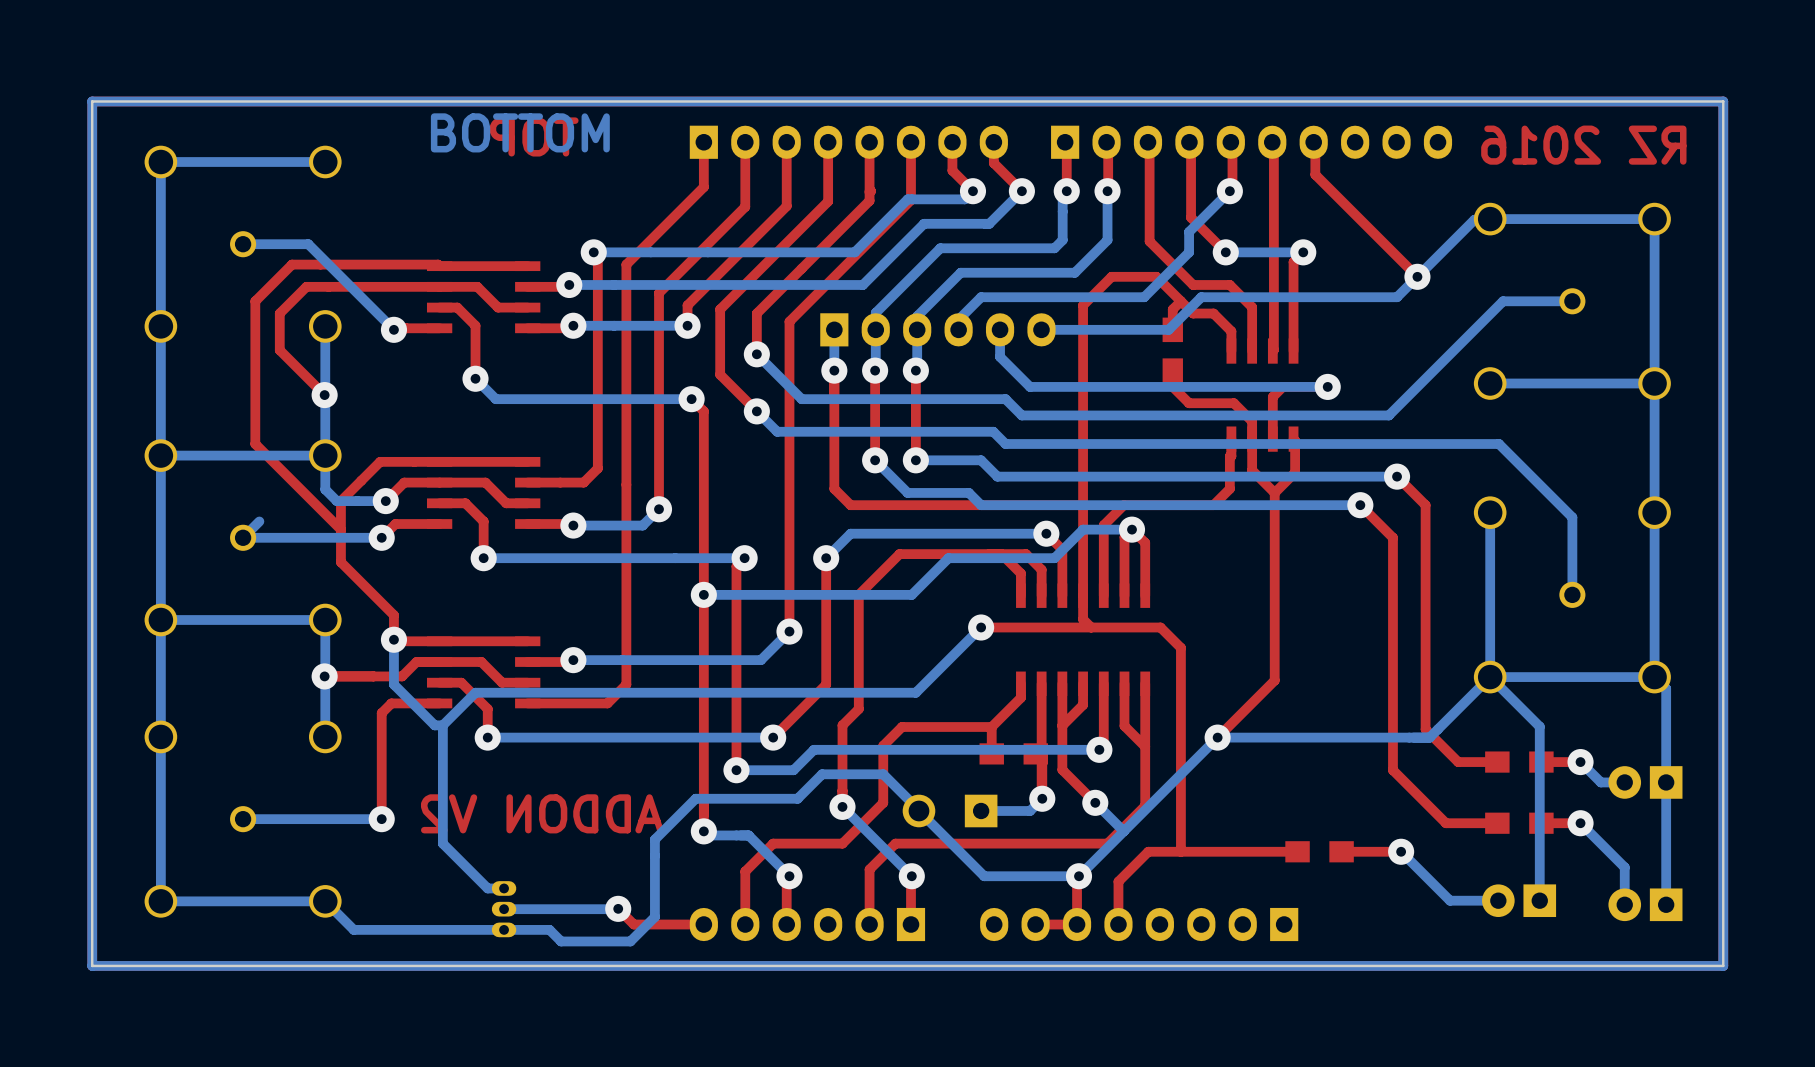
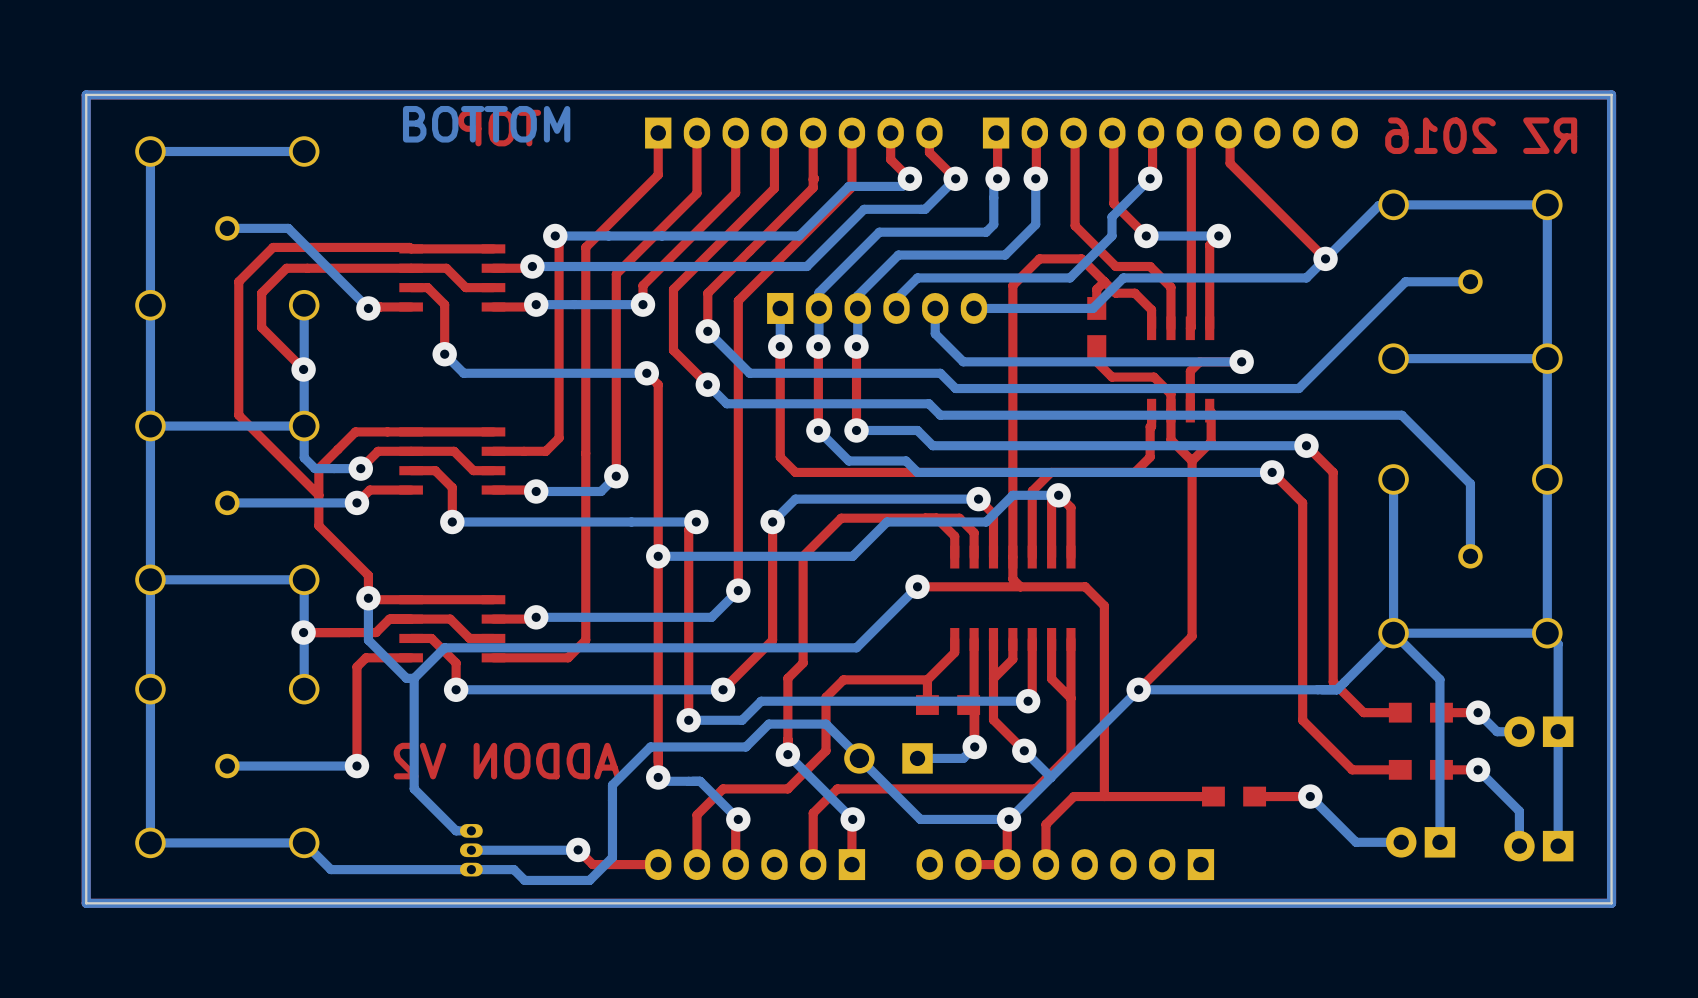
bottom track: (259, 521) (243, 537) -> none

